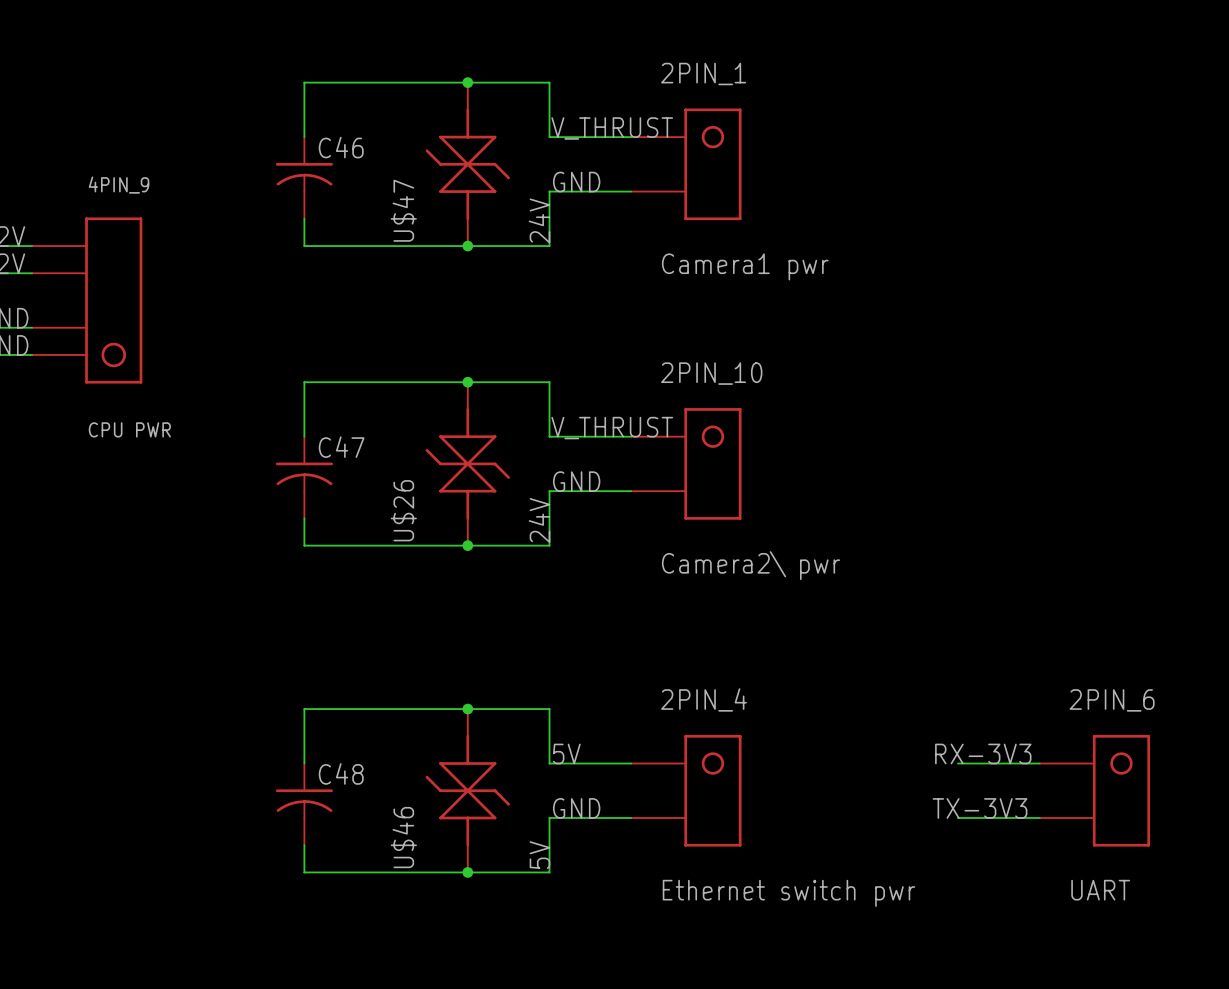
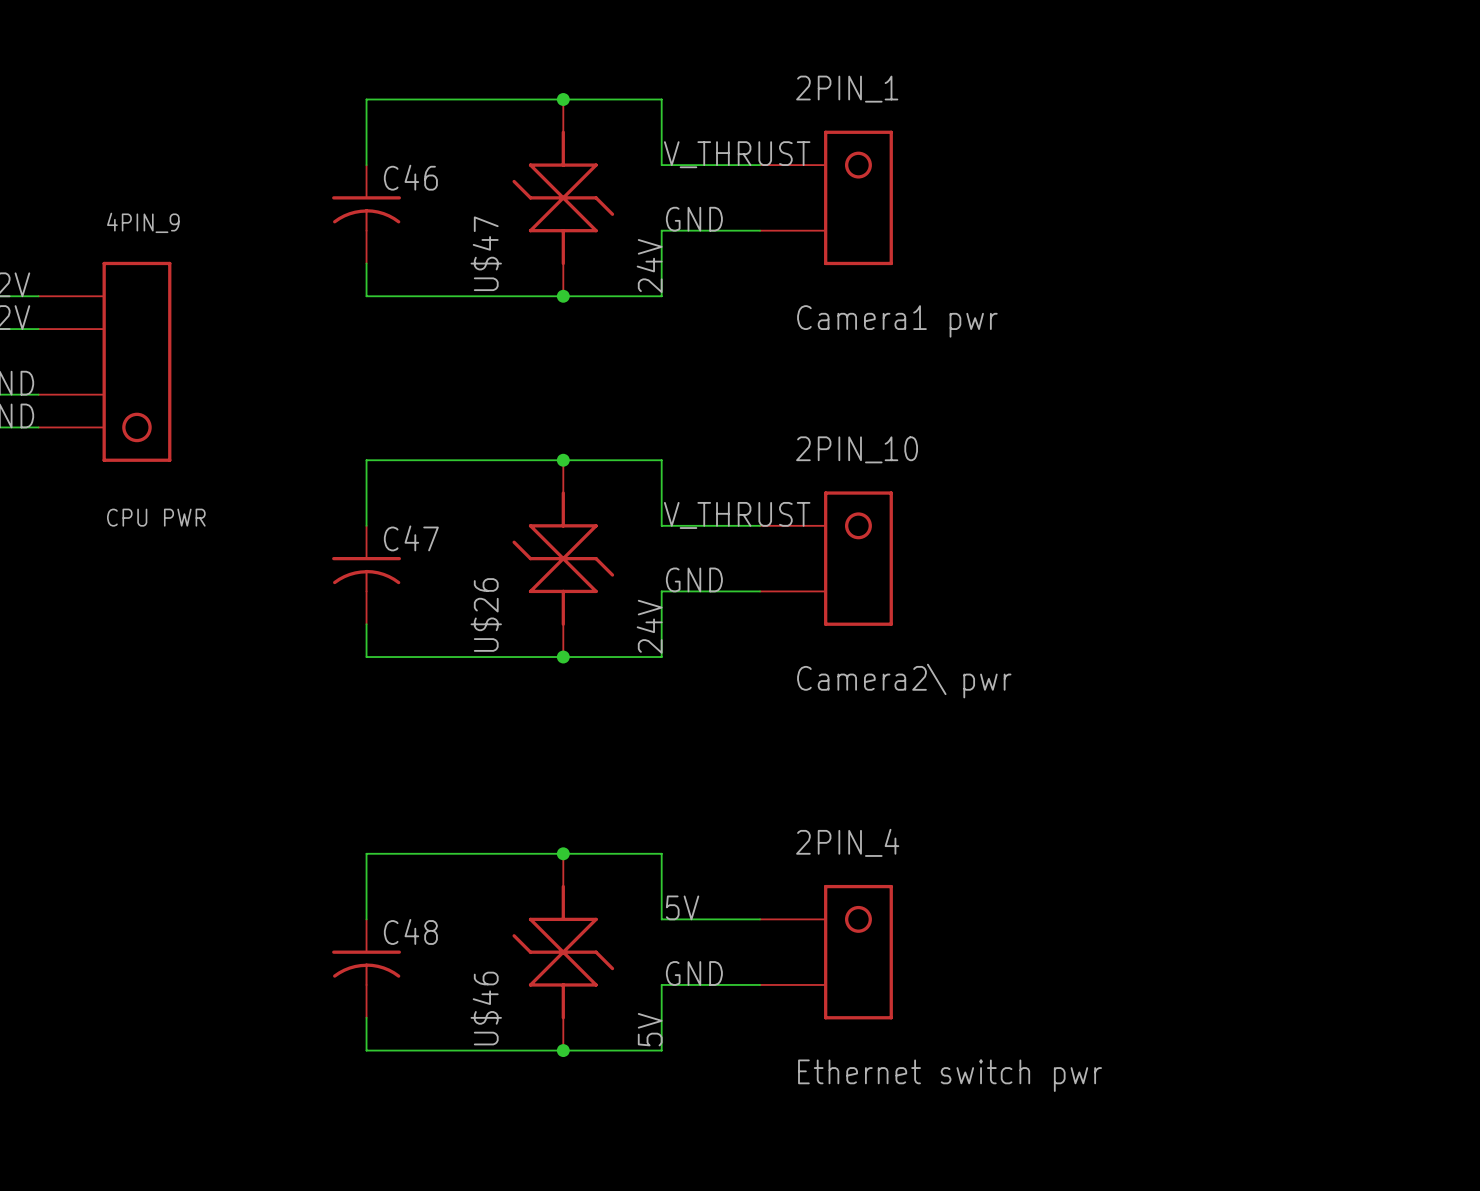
label: RX-3V3 (983, 753) -> none
wire: (958, 763) (1039, 763) -> none
2PIN_6: UART (1094, 790) -> none
label: TX-3V3 (980, 808) -> none
wire: (958, 817) (1039, 817) -> none

